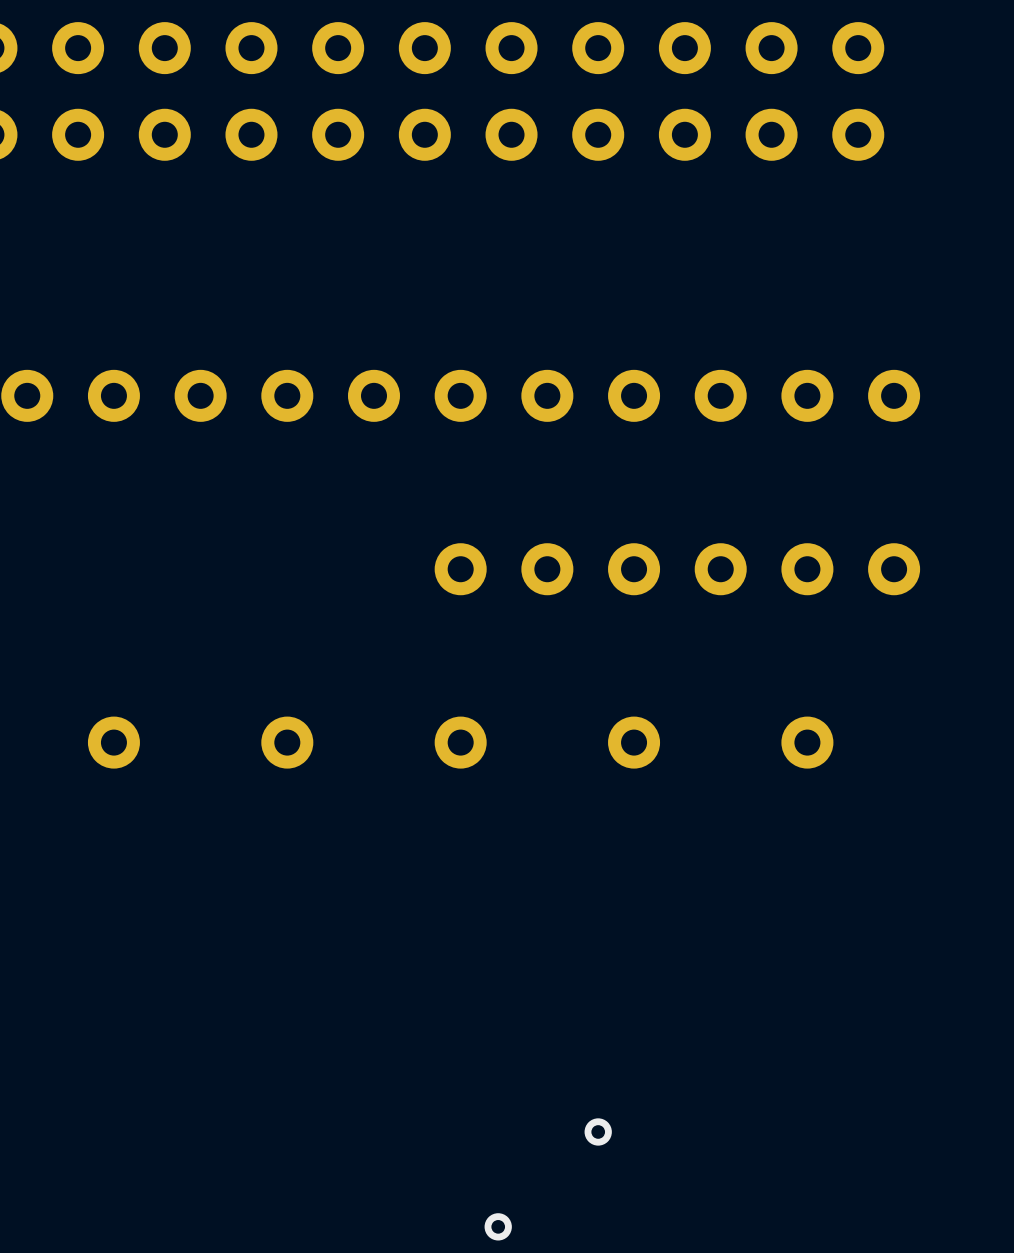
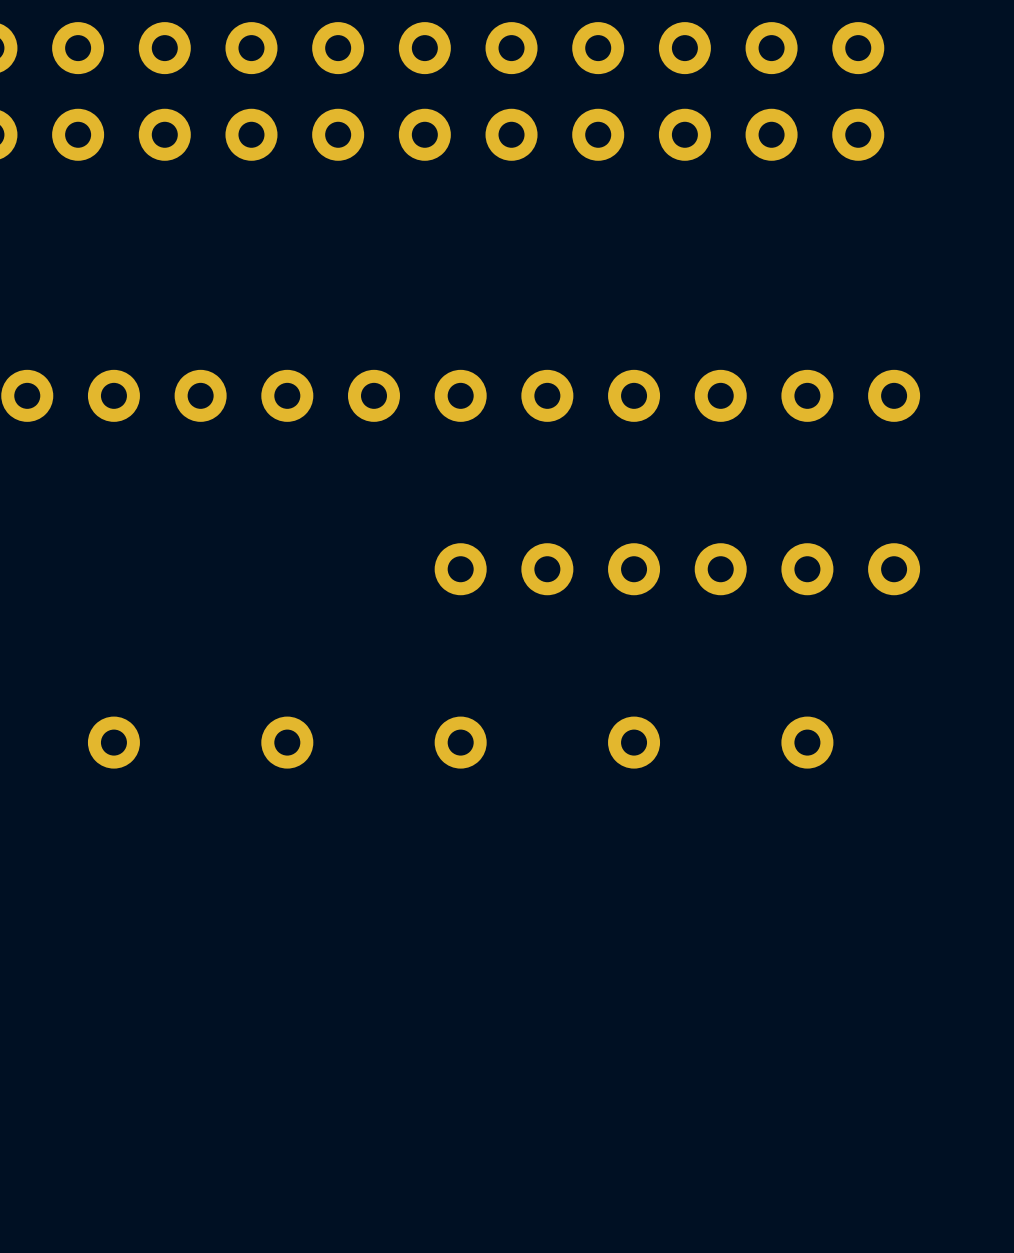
via: (598, 1131) -> none
via: (498, 1226) -> none

